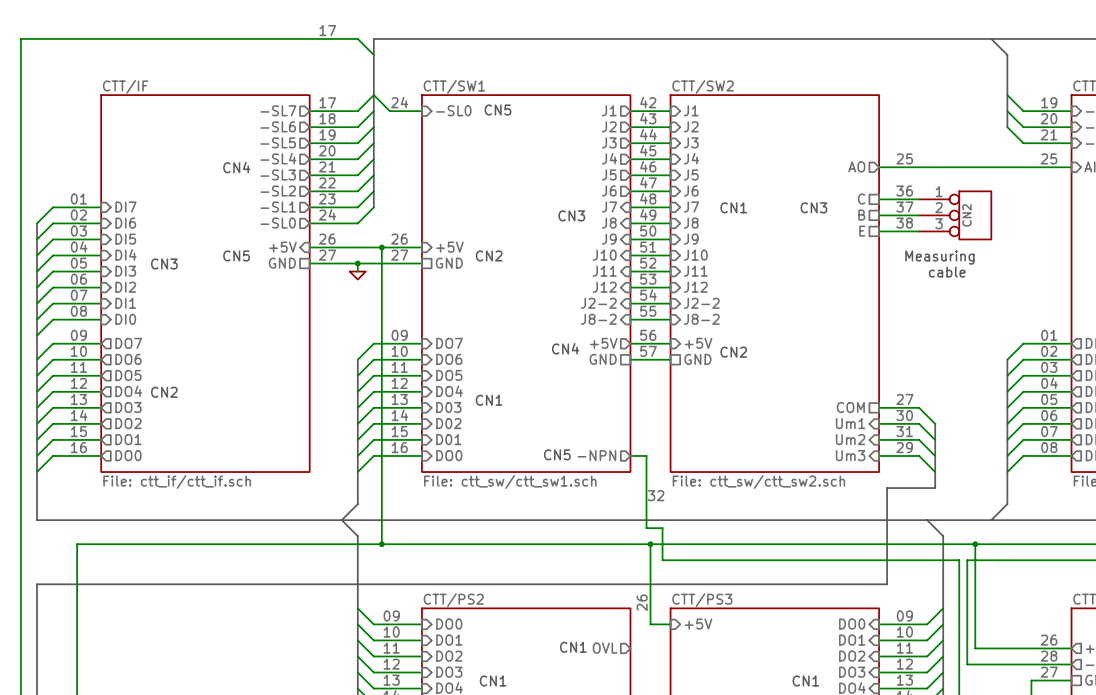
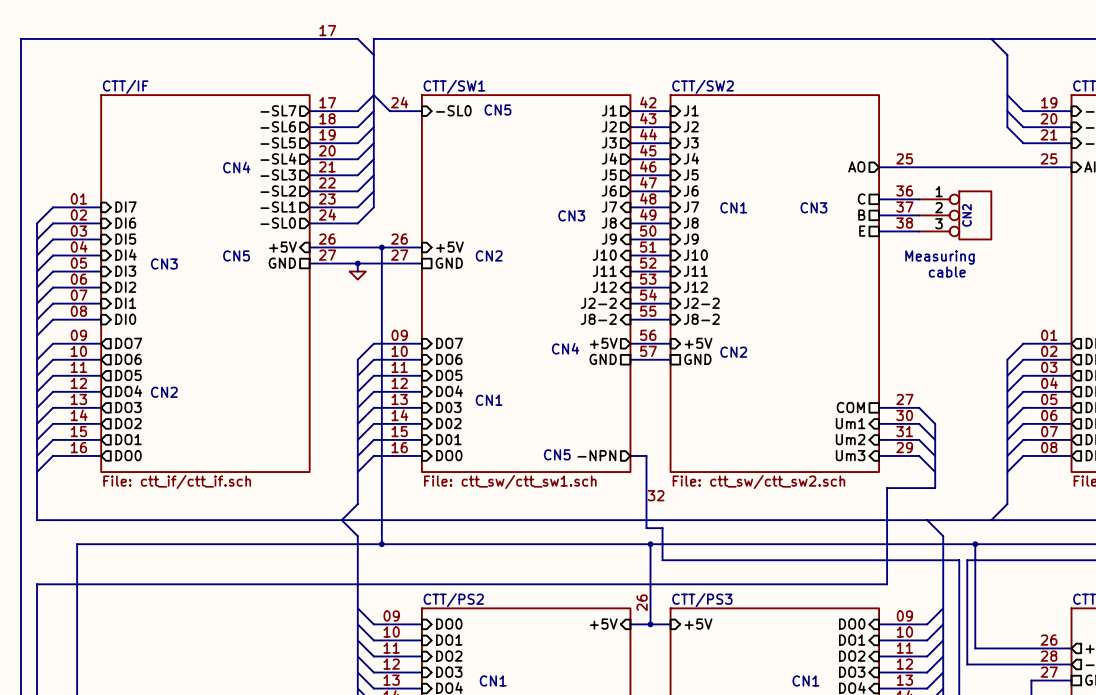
sheet pin: none -> +5V (603, 624)
wire: none -> (630, 624) (650, 624)
junction: none -> (650, 624)
text: CN1 (573, 647) -> none
sheet pin: OVL (605, 648) -> none

